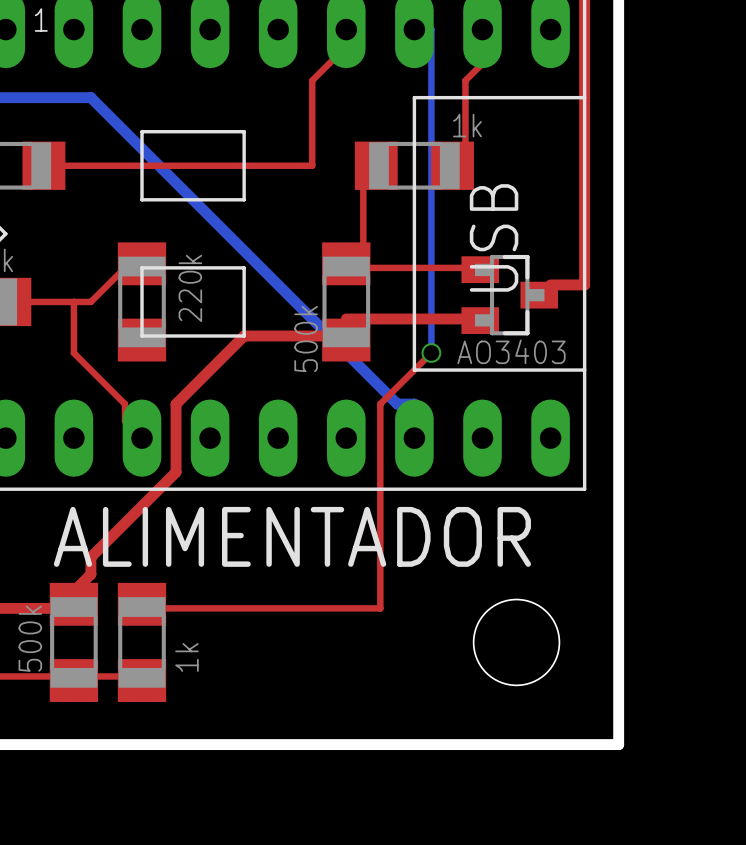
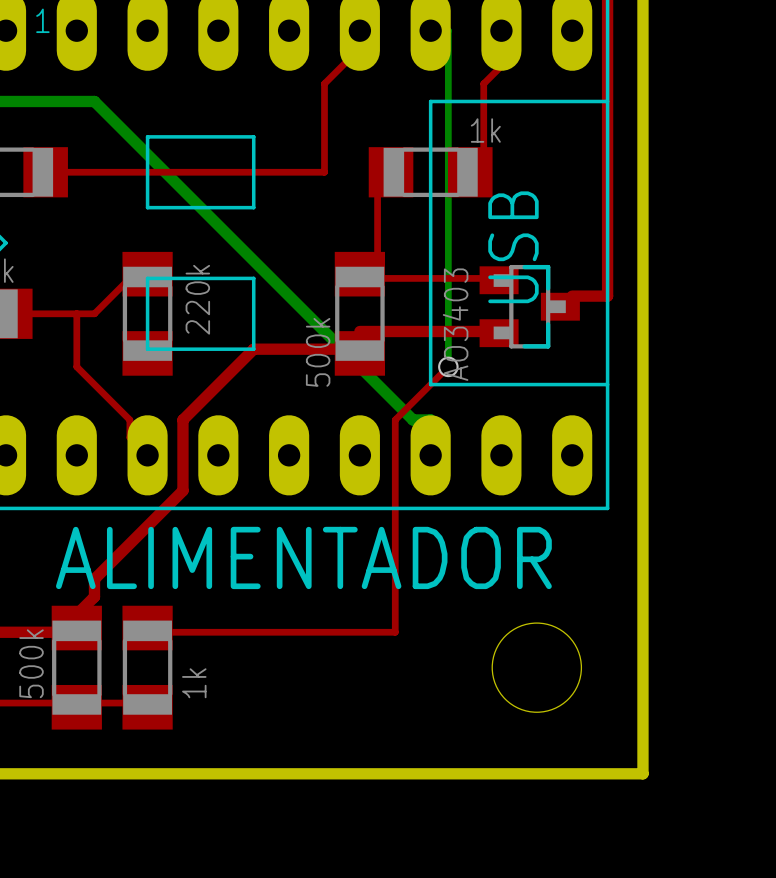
part value rotation: 0° (511, 351) -> 90° counterclockwise (455, 324)

